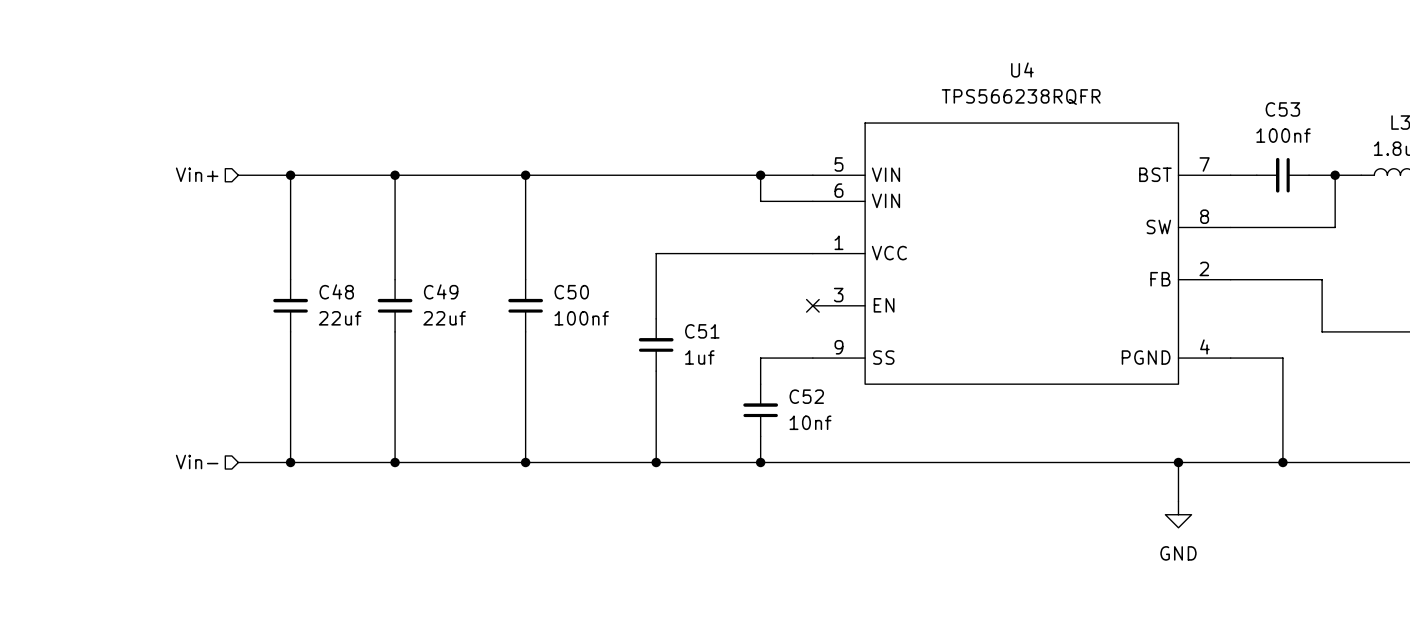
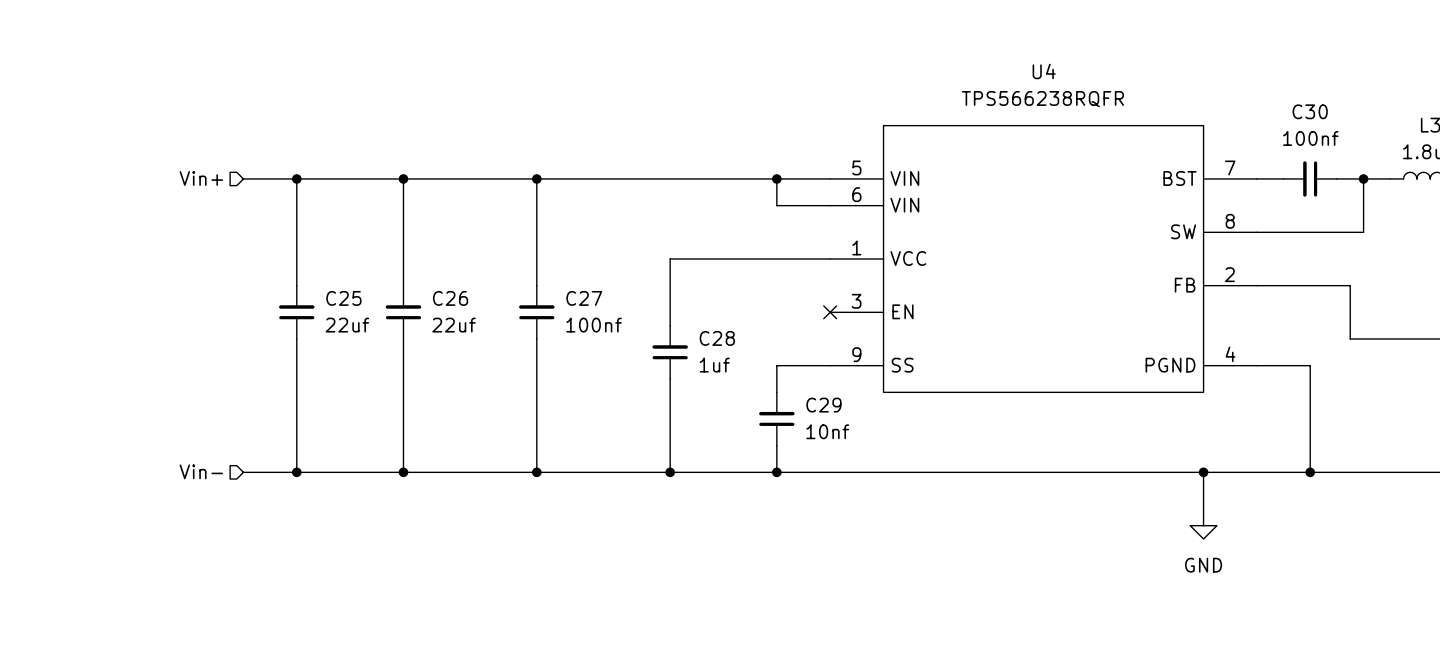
C53 name: C53 (1282, 109) -> C30 (1310, 111)
C48 name: C48 (336, 291) -> C25 (343, 298)
C49 name: C49 (441, 291) -> C26 (450, 298)
C50 name: C50 (571, 292) -> C27 (584, 298)
C51 name: C51 (702, 331) -> C28 (717, 338)
C52 name: C52 (806, 396) -> C29 (823, 405)

